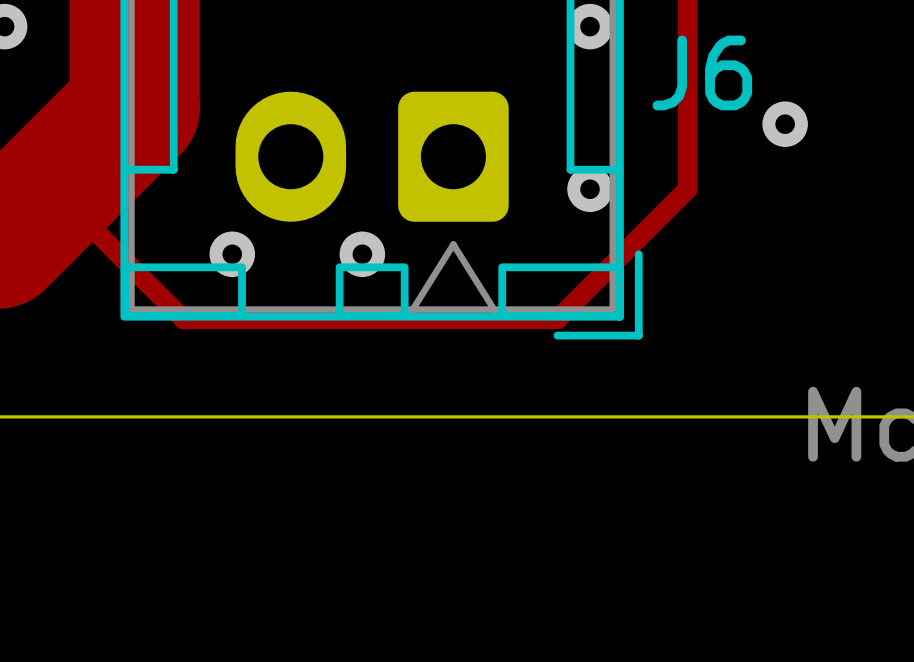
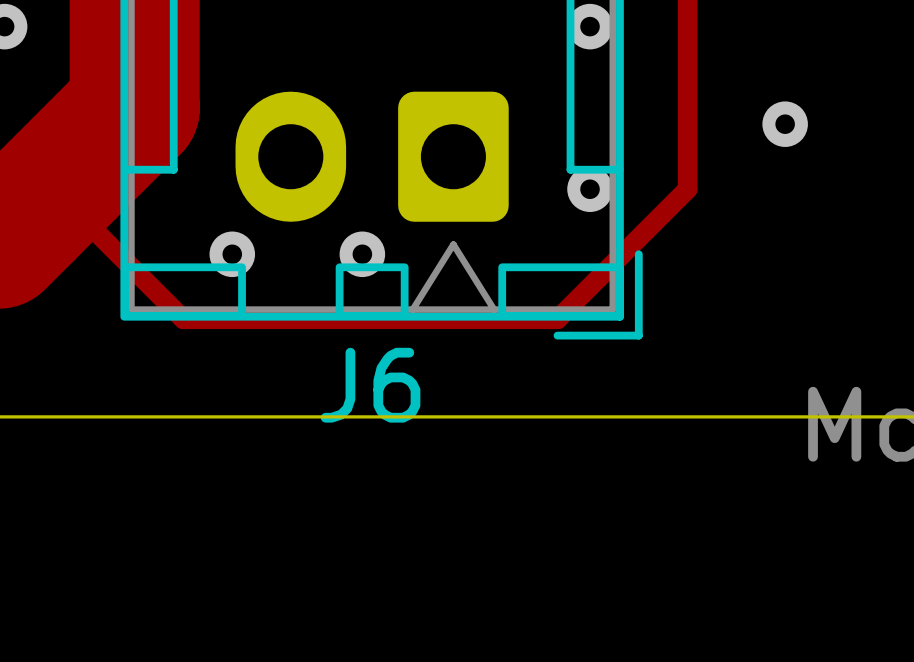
J6 name position: J6 (702, 72) -> J6 (370, 385)

